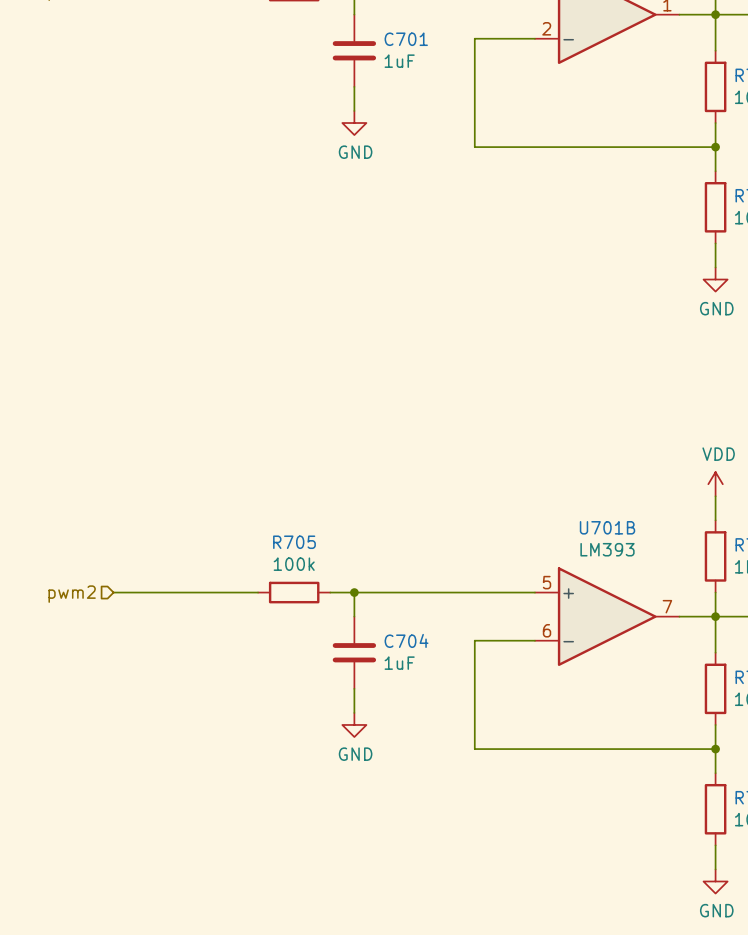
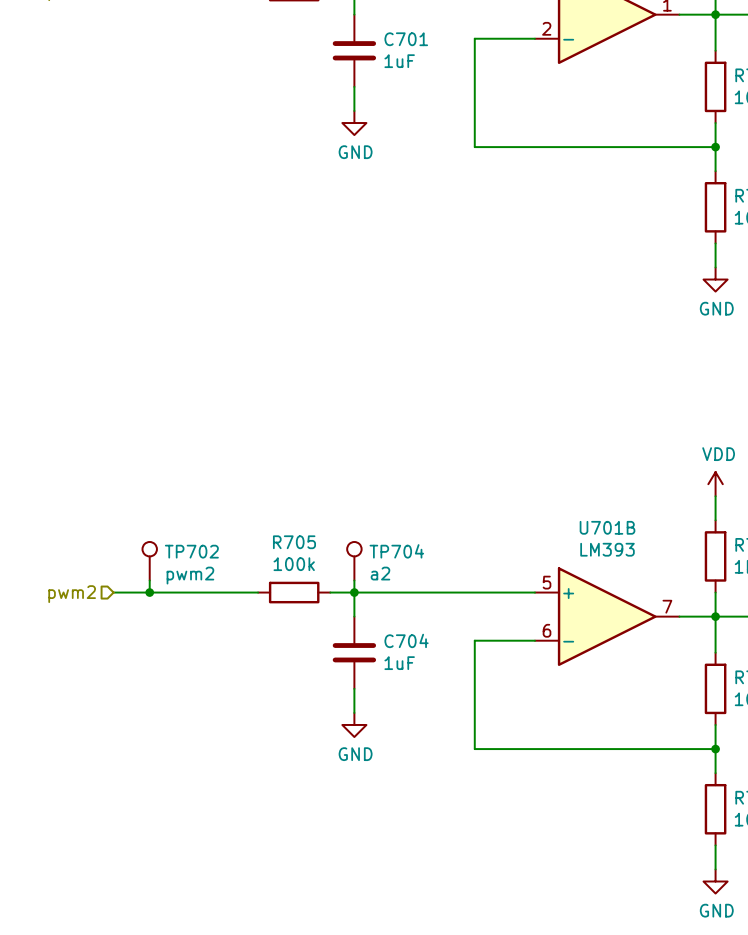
TP702: none -> pwm2 (149, 561)
TP704: none -> a2 (354, 561)
wire: none -> (149, 580) (149, 592)
wire: none -> (354, 580) (354, 592)
junction: none -> (149, 592)

